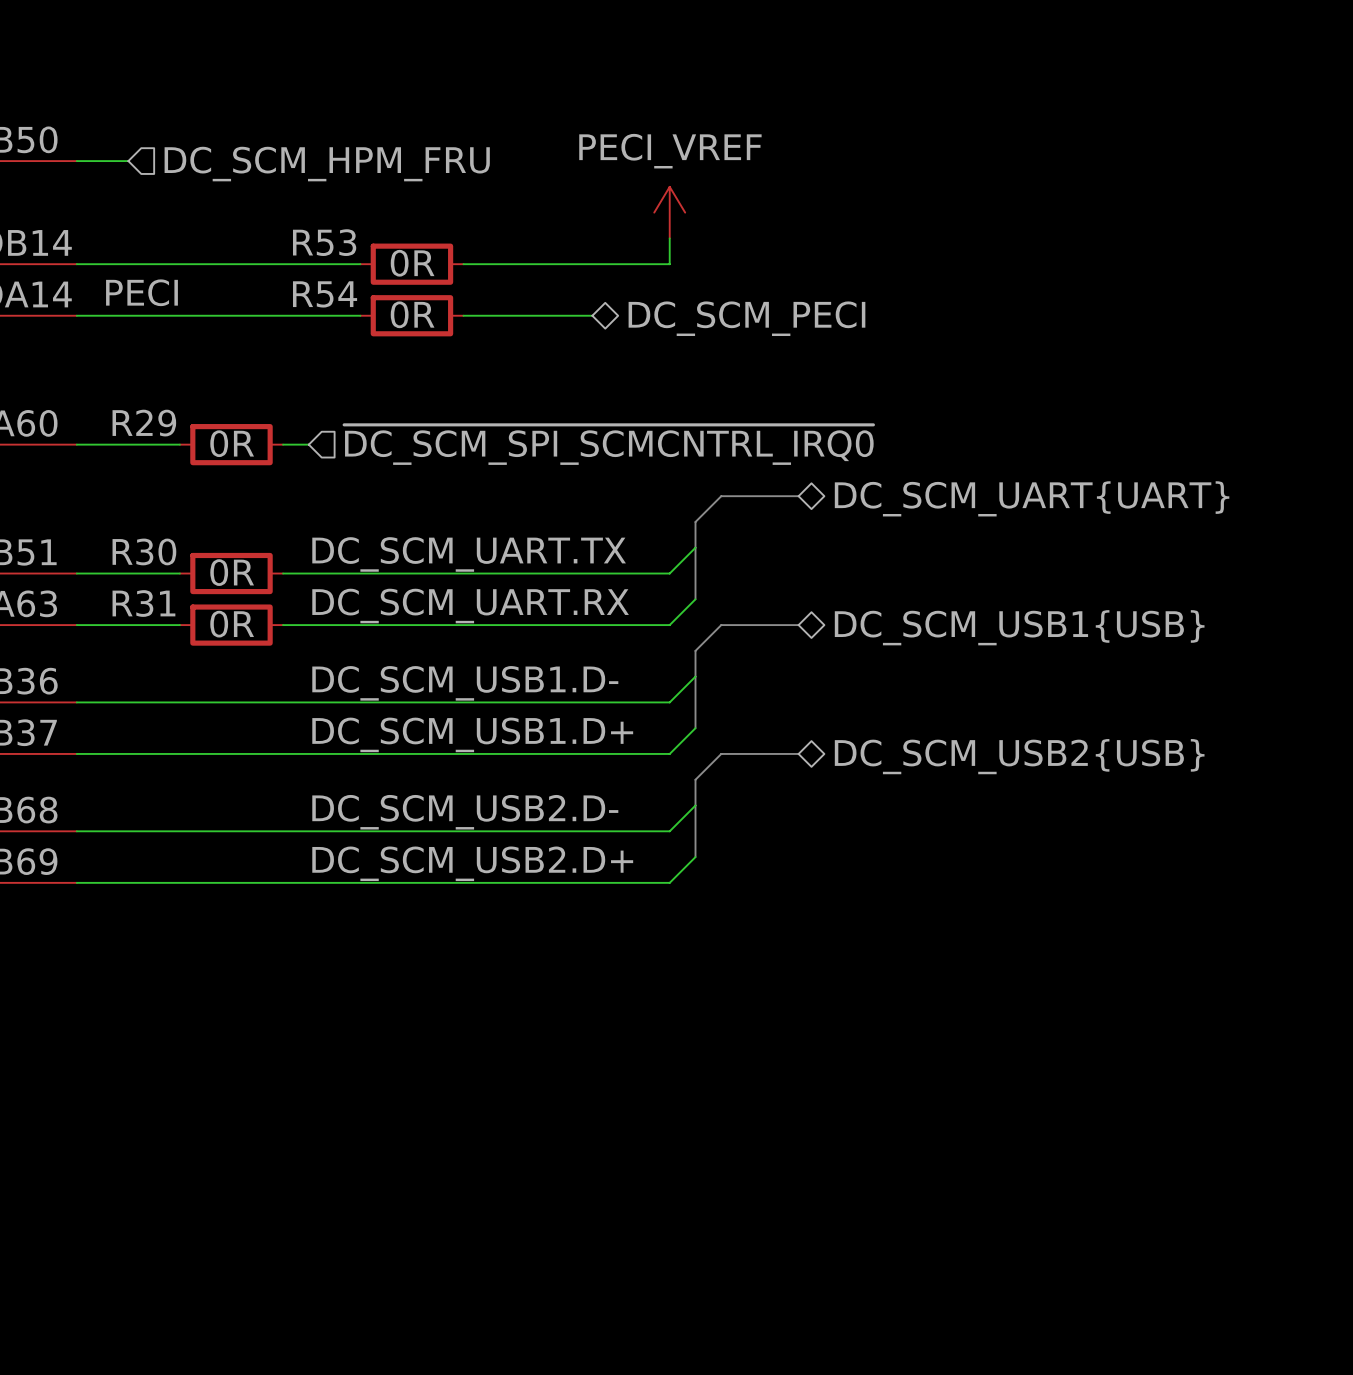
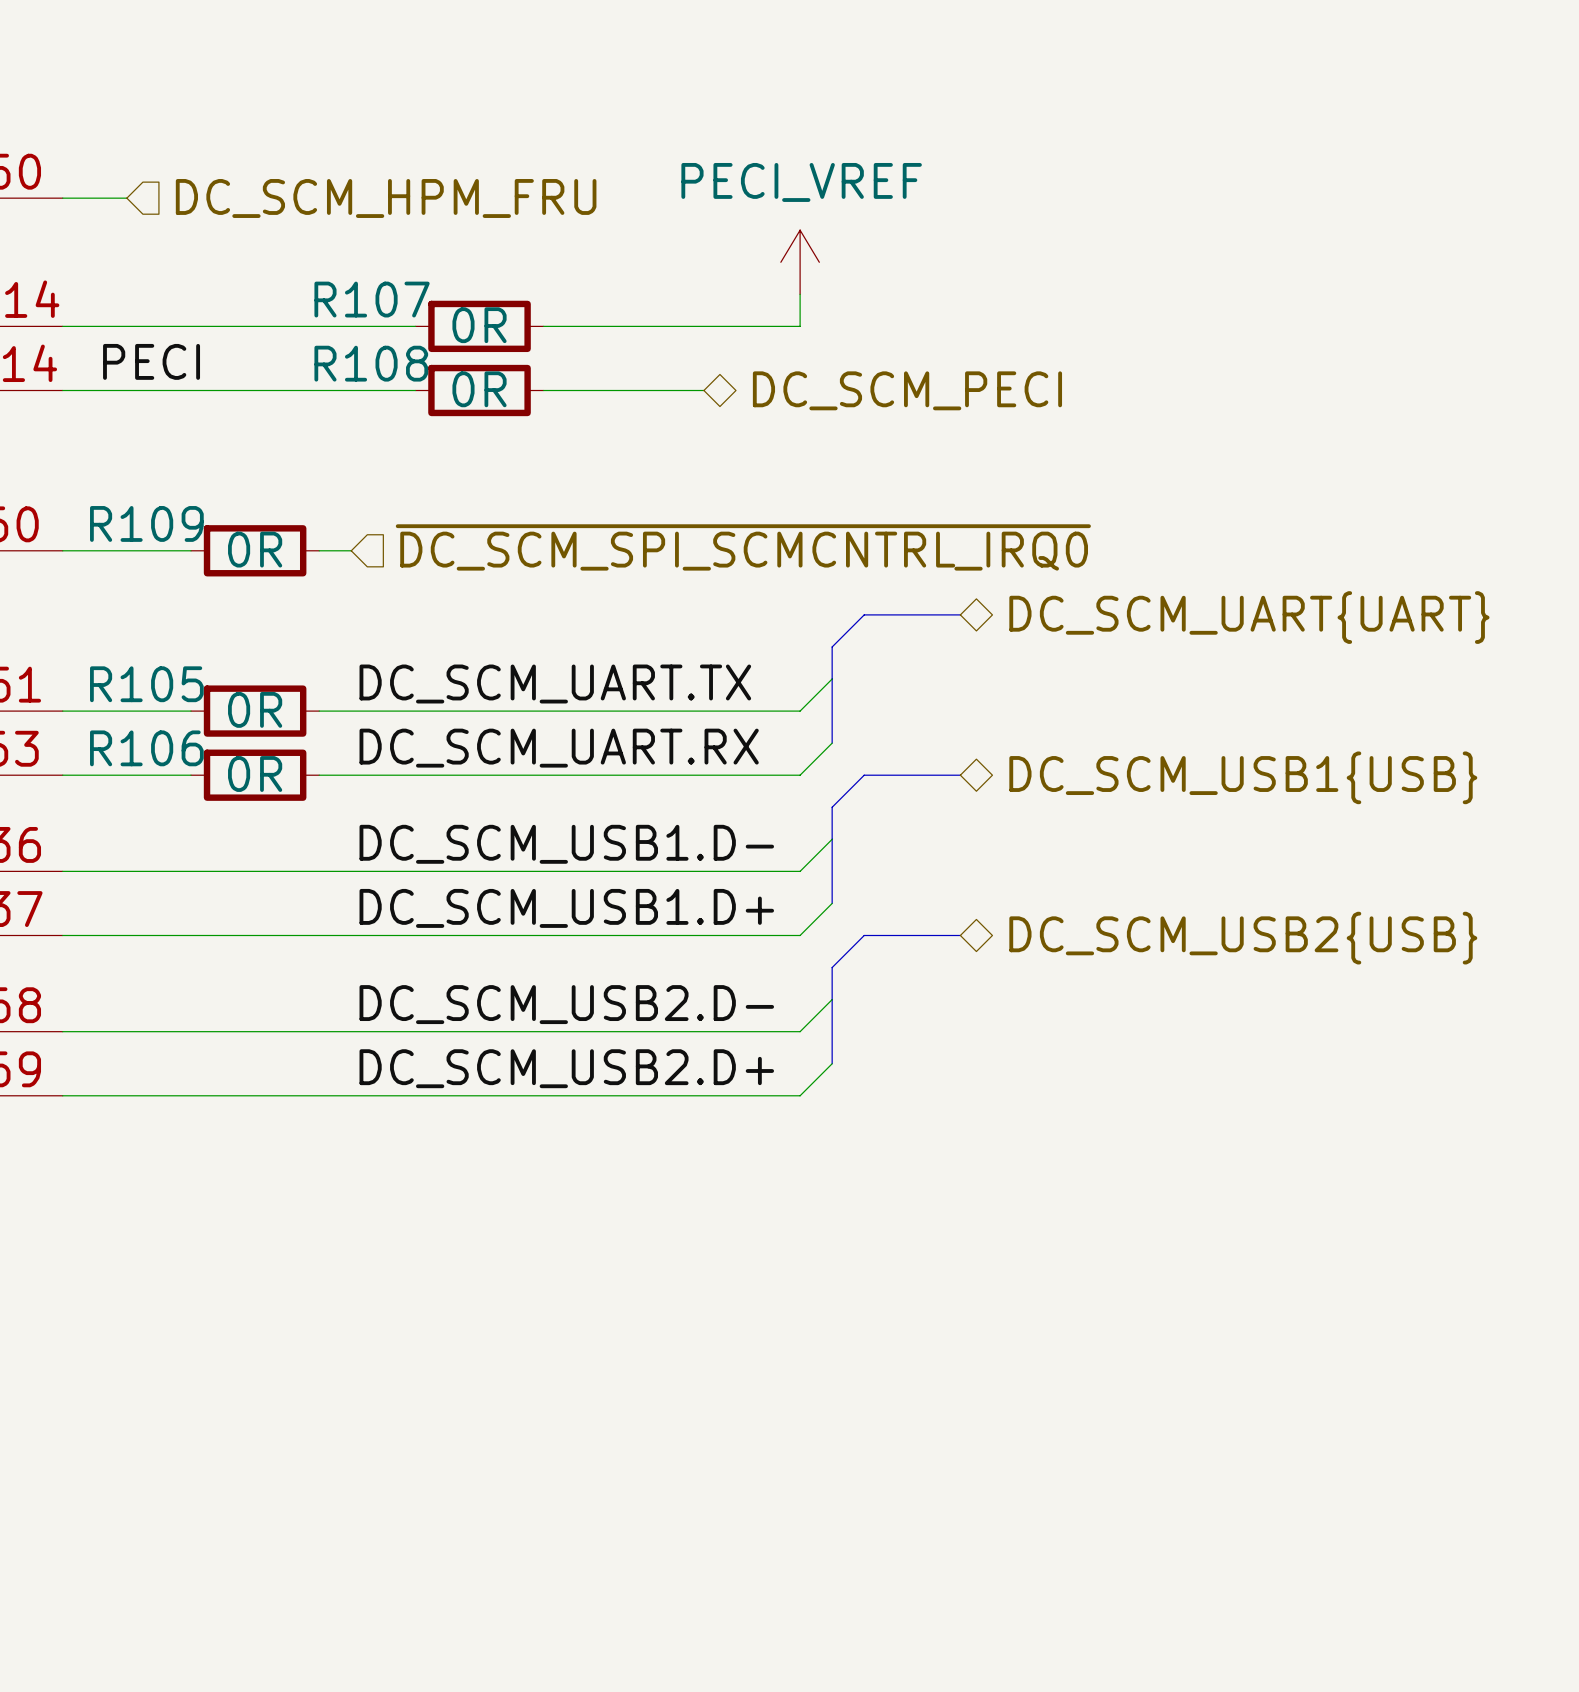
R53 name: R53 (324, 242) -> R107 (372, 299)
R54 name: R54 (325, 294) -> R108 (371, 363)
R29 name: R29 (144, 423) -> R109 (146, 523)
R30 name: R30 (144, 551) -> R105 (146, 684)
R31 name: R31 (143, 603) -> R106 (146, 748)

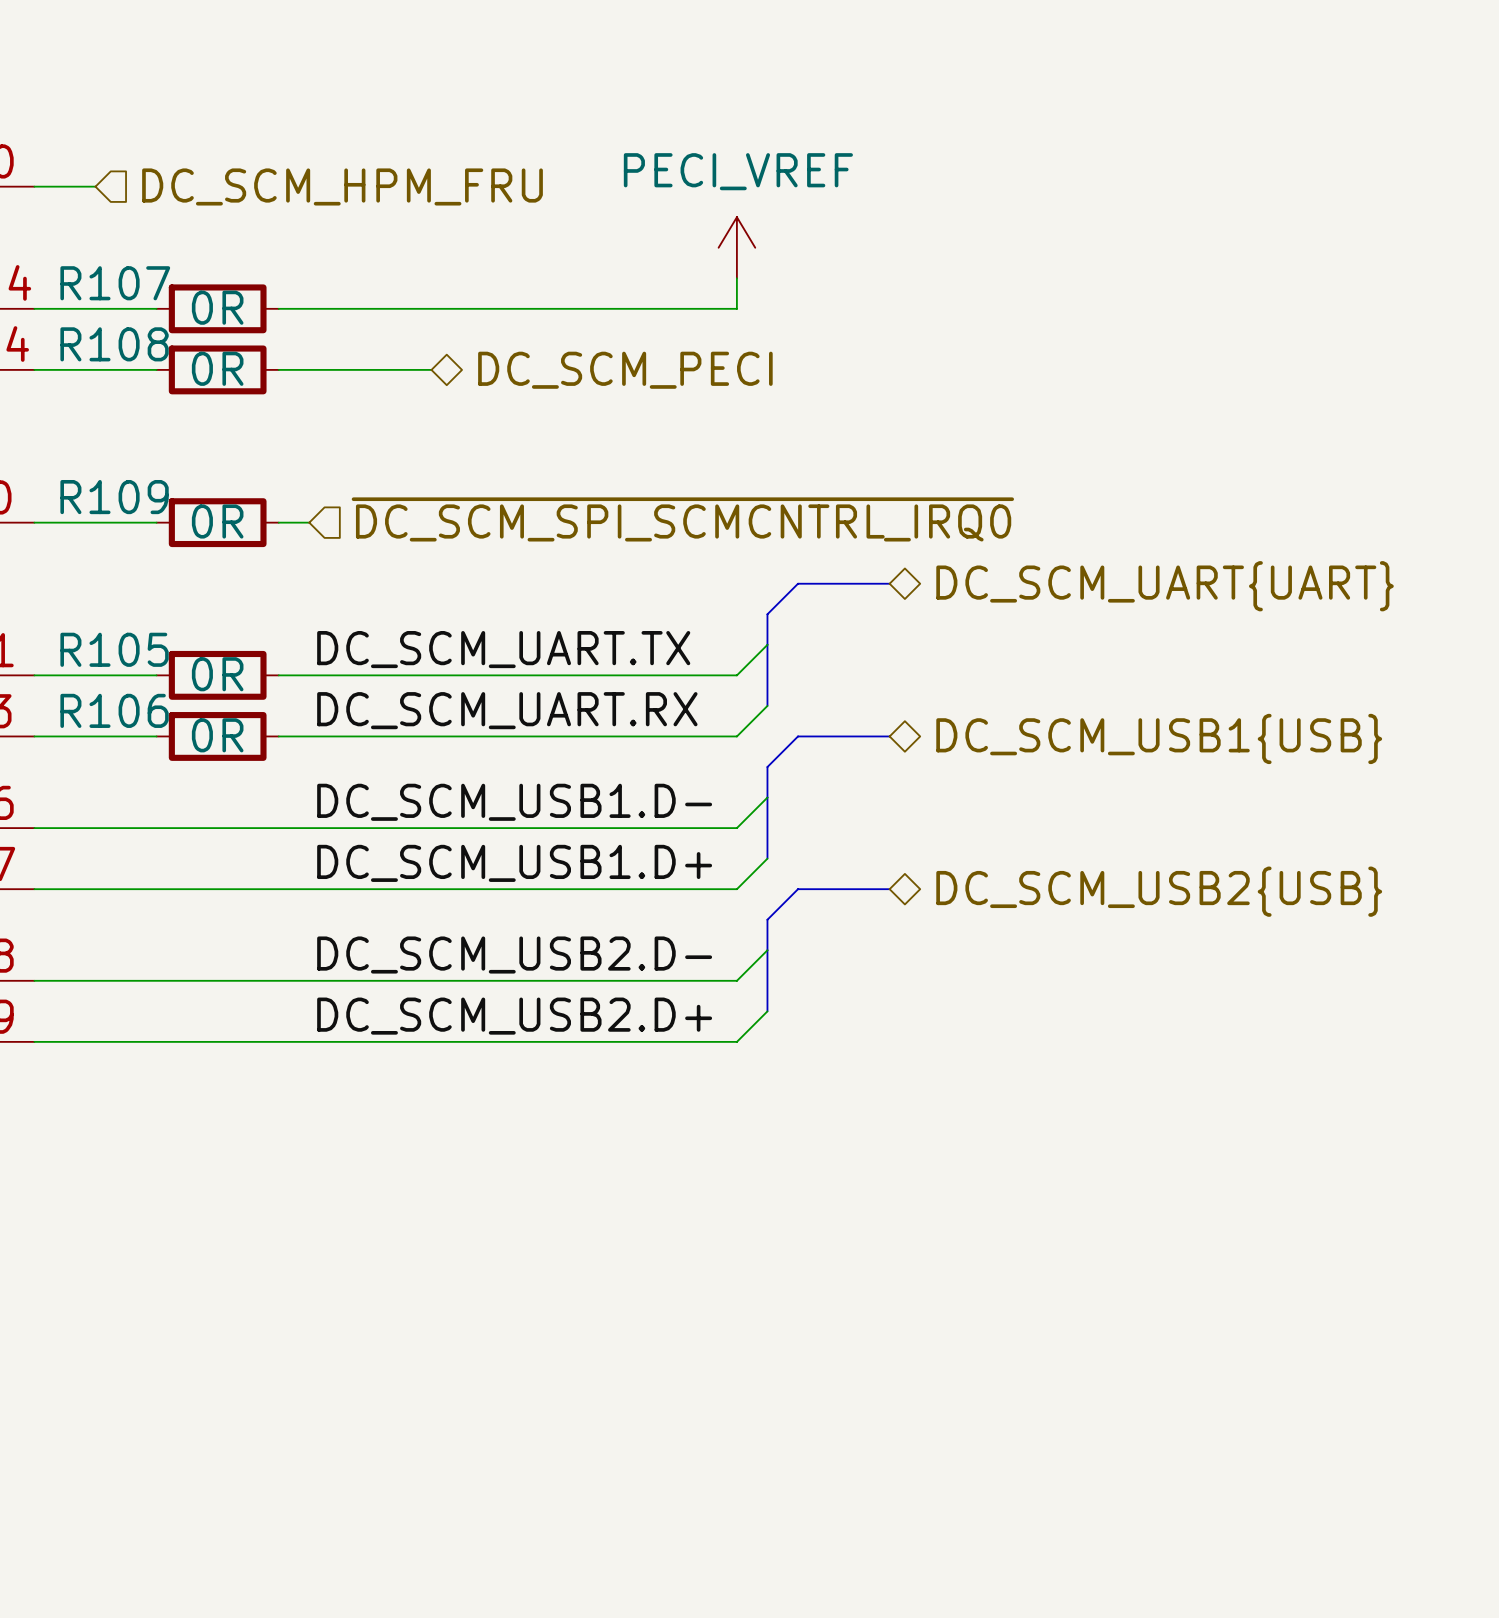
wire: (190, 326) (319, 326) -> (370, 308) (492, 308)
R107 position: (479, 326) -> (217, 308)
label: PECI (151, 361) -> none
wire: (190, 390) (319, 390) -> none
wire: none -> (370, 369) (431, 369)
R108 position: (479, 390) -> (217, 369)
wire: (543, 390) (703, 390) -> none
hierarchical label position: DC_SCM_PECI (907, 390) -> DC_SCM_PECI (625, 370)

